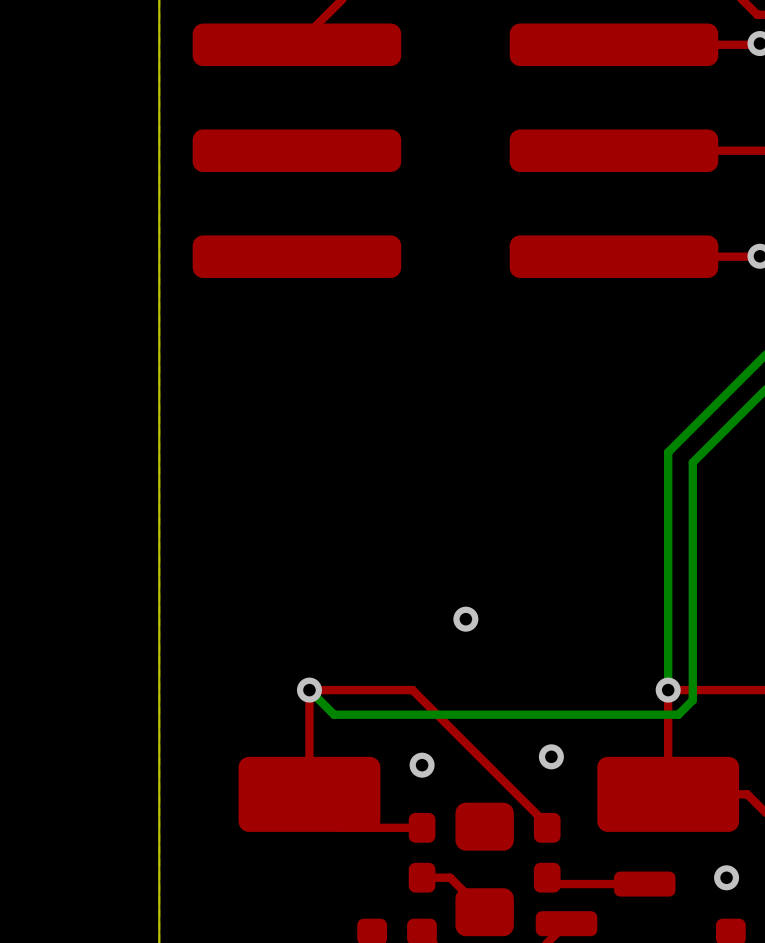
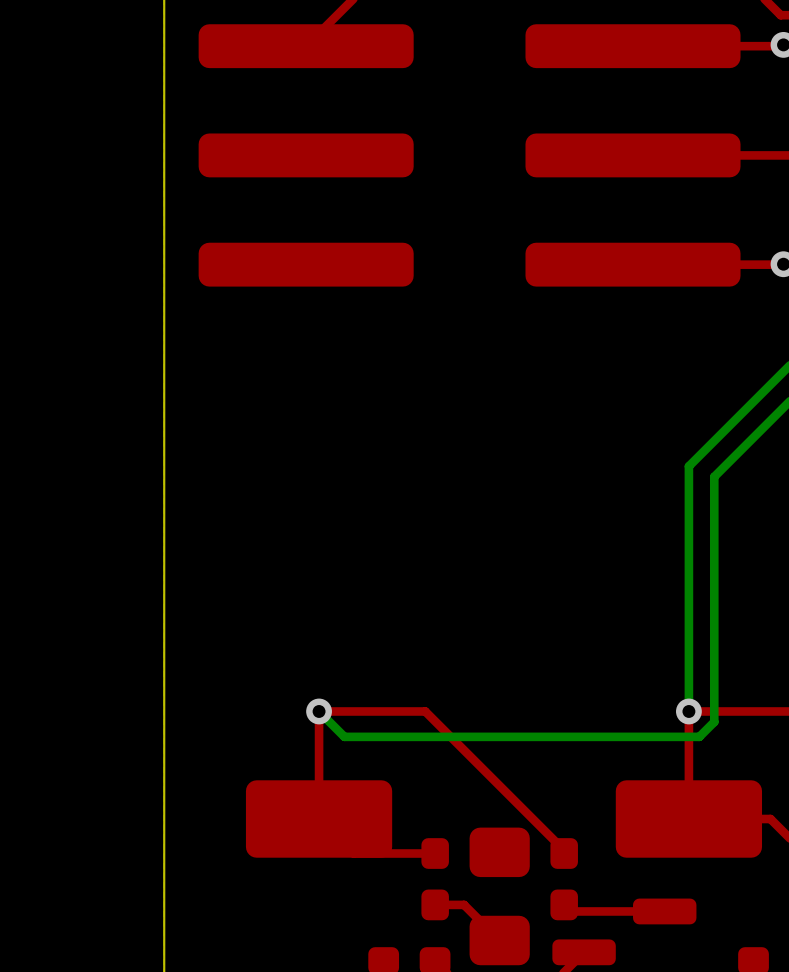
via: (465, 619) -> none
via: (551, 756) -> none
via: (422, 765) -> none
via: (726, 877) -> none

